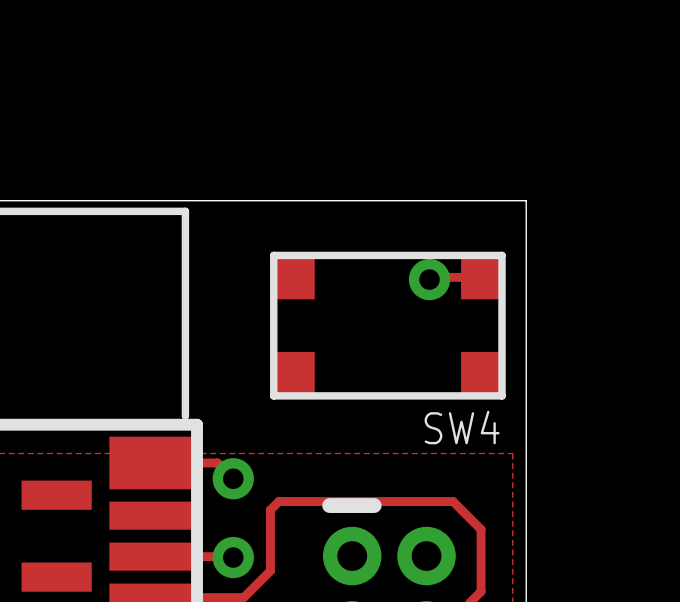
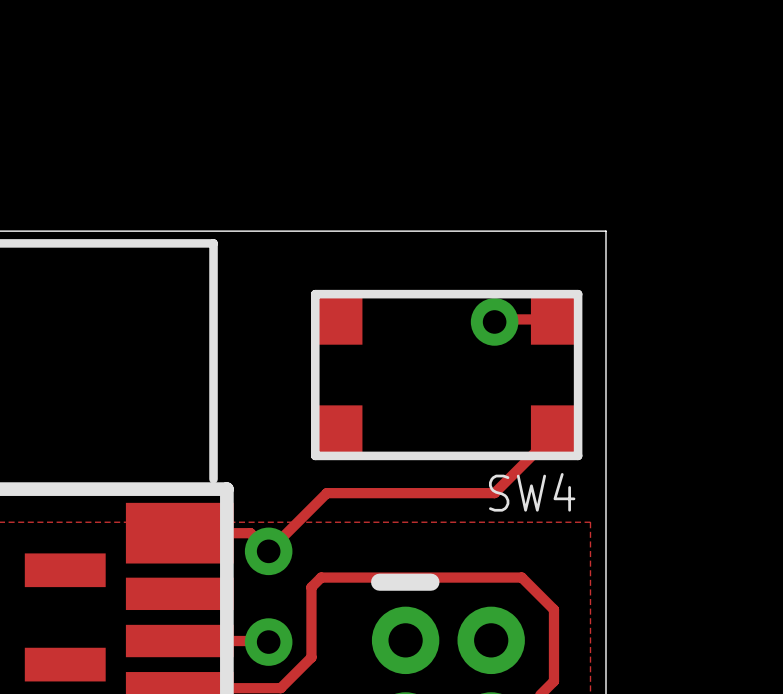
track: none -> (554, 430) (554, 433) (494, 493) (326, 493) (268, 551)

